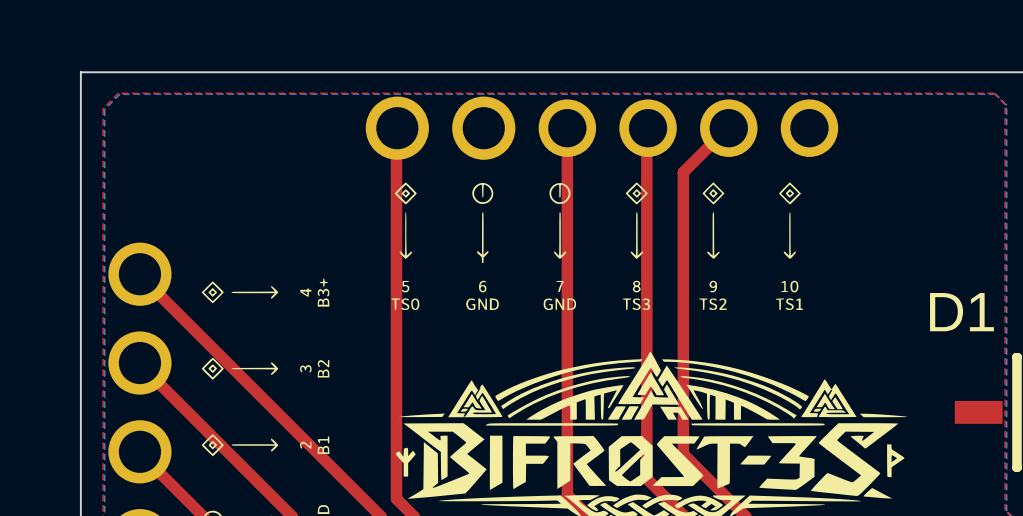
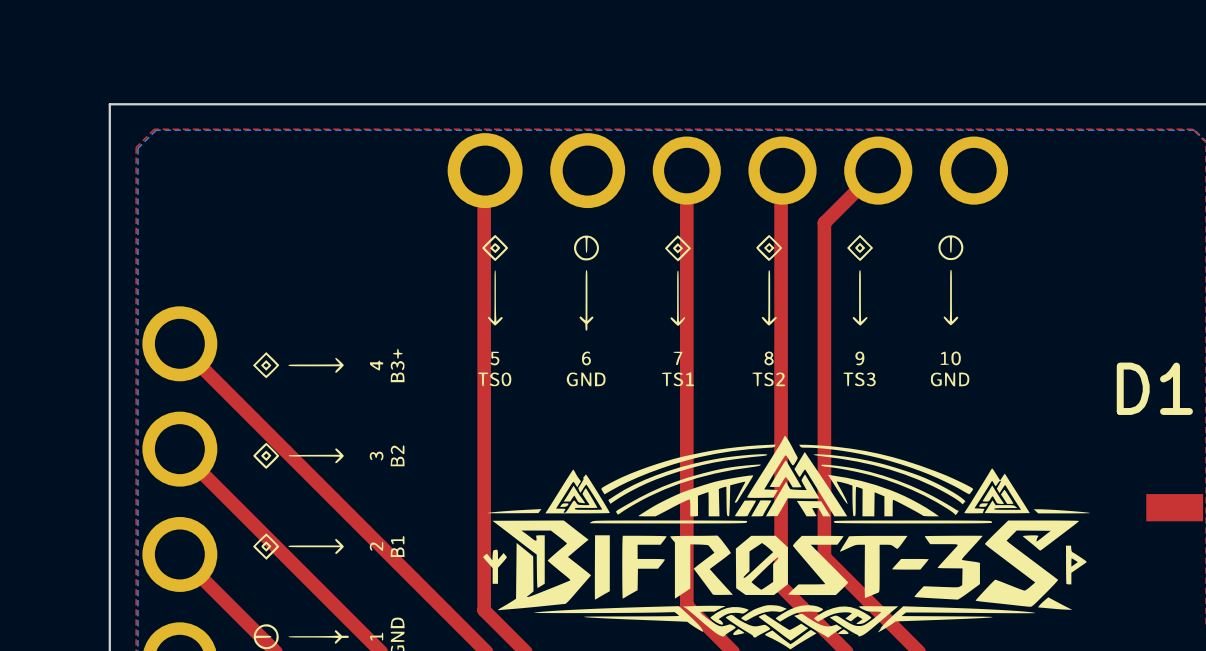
drawing shape: [391, 182, 803, 311] -> [478, 234, 970, 387]

